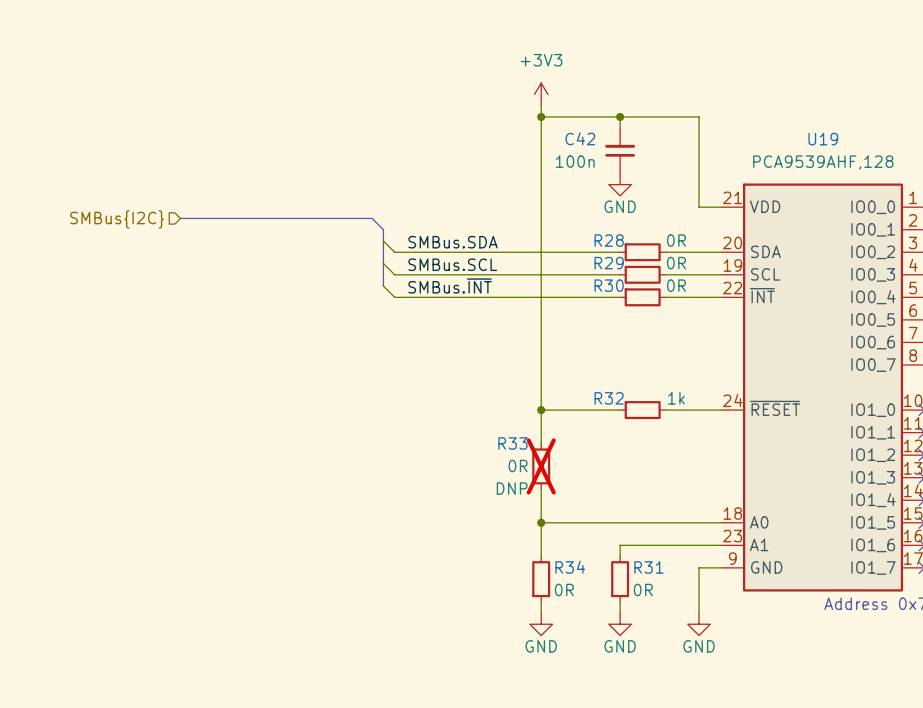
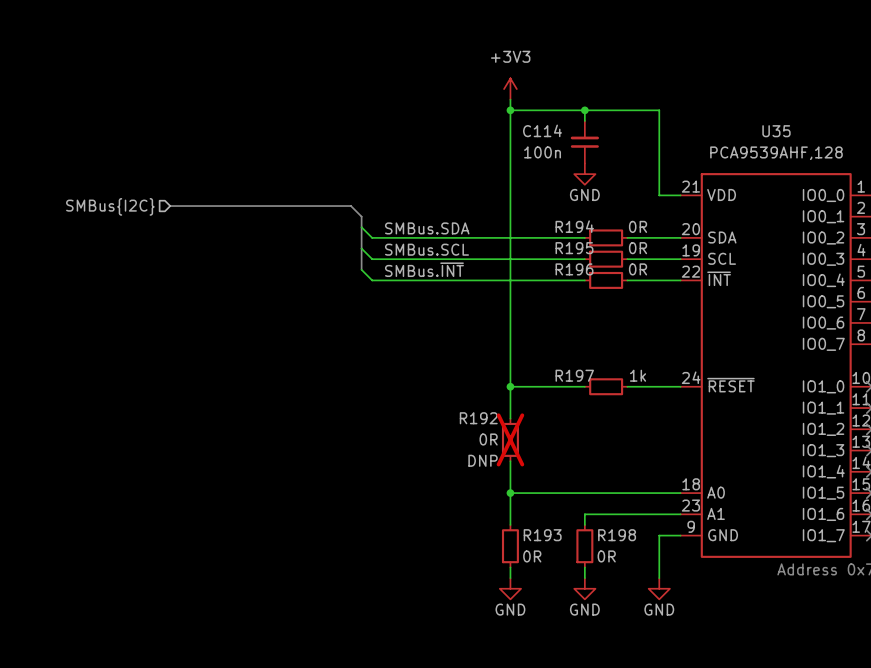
C42 name: C42 (580, 138) -> C114 (542, 130)
U19 name: U19 (823, 139) -> U35 (776, 131)
R28 name: R28 (609, 240) -> R194 (574, 226)
R29 name: R29 (609, 263) -> R195 (574, 248)
R30 name: R30 (609, 285) -> R196 (574, 269)
R32 name: R32 (609, 398) -> R197 (574, 375)
R33 name: R33 (512, 443) -> R192 (478, 418)
R34 name: R34 (570, 567) -> R193 (542, 535)
R31 name: R31 (648, 567) -> R198 (617, 535)

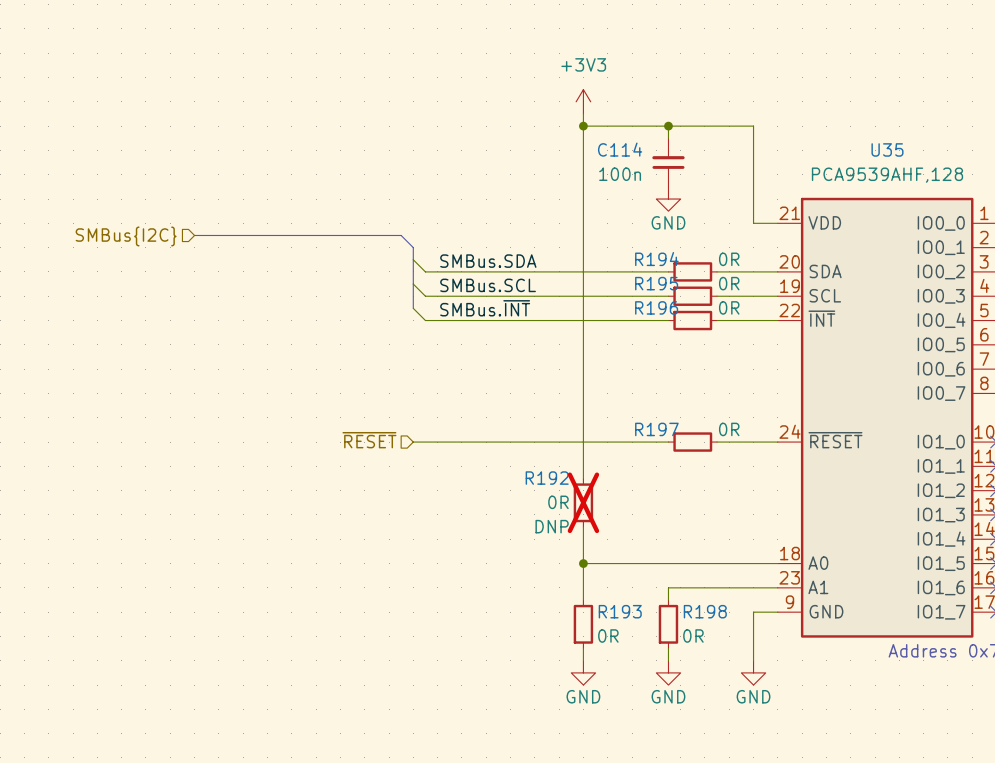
R197 text: 1k (638, 375) -> 0R (729, 429)
hierarchical label: none -> ~{RESET} (369, 440)
wire: none -> (413, 442) (583, 442)
junction: (510, 386) -> none

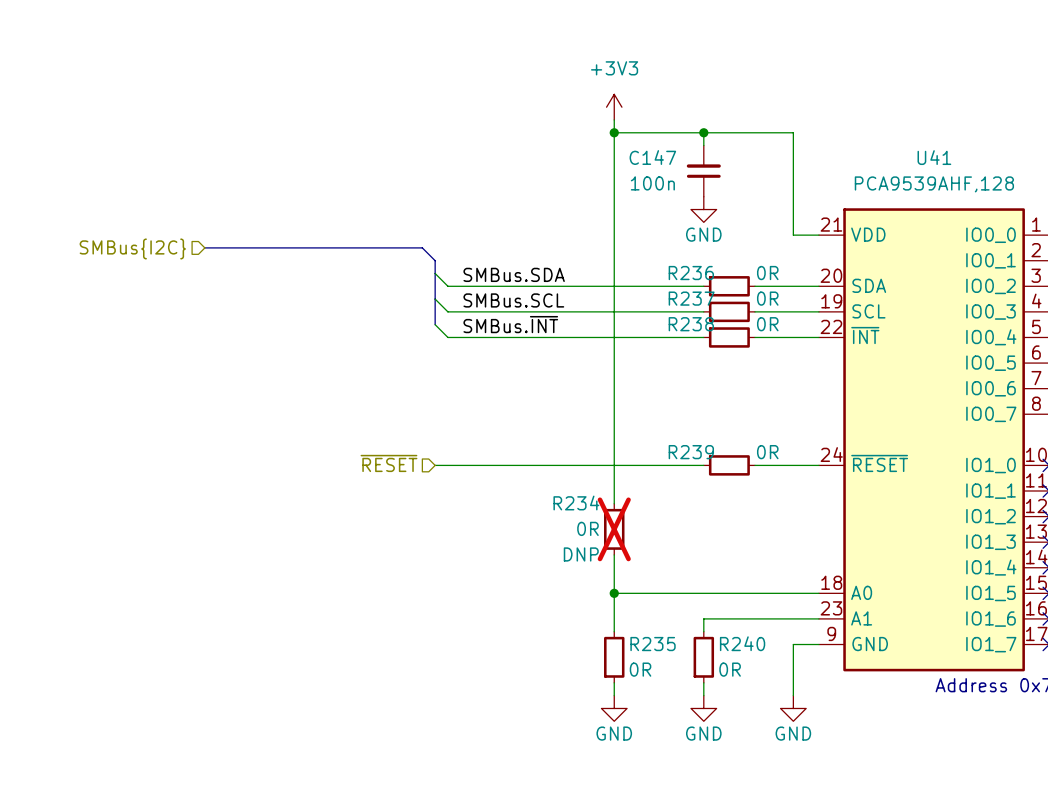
C114 name: C114 (620, 149) -> C147 (652, 157)
U35 name: U35 (887, 149) -> U41 (934, 157)
R194 name: R194 (656, 259) -> R236 (691, 273)
R195 name: R195 (656, 283) -> R237 (691, 298)
R196 name: R196 (656, 307) -> R238 (691, 324)
R197 name: R197 (656, 429) -> R239 (691, 452)
R192 name: R192 (547, 478) -> R234 (576, 503)
R193 name: R193 (620, 611) -> R235 (653, 644)
R198 name: R198 (705, 611) -> R240 (742, 643)

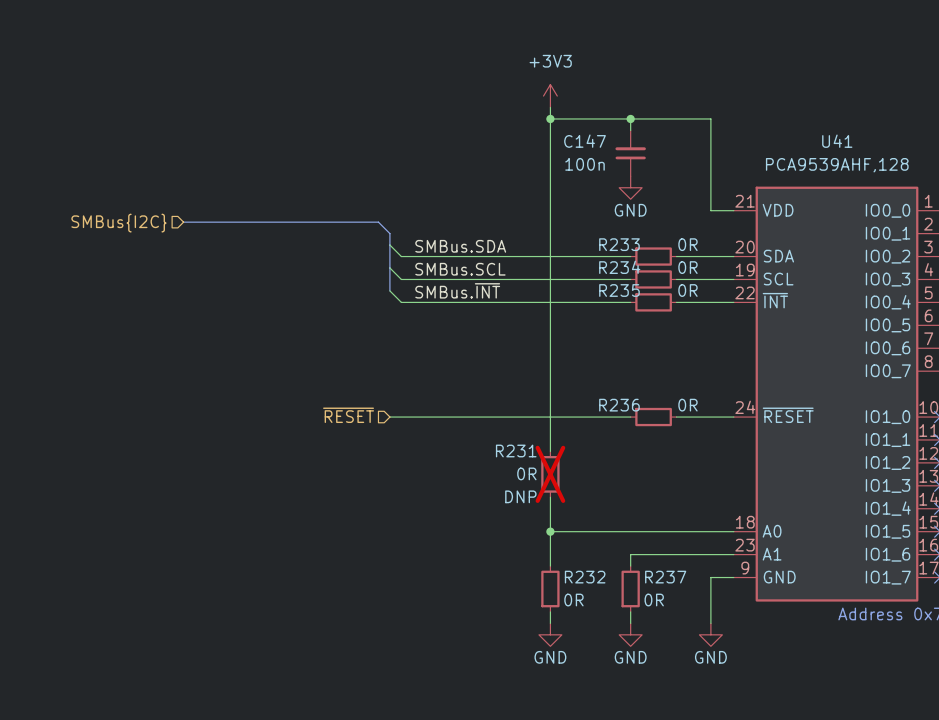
R236 name: R236 (691, 273) -> R233 (619, 244)
R237 name: R237 (691, 298) -> R234 (619, 267)
R238 name: R238 (691, 324) -> R235 (619, 290)
R239 name: R239 (691, 452) -> R236 (619, 405)
R234 name: R234 (576, 503) -> R231 (516, 451)
R240 name: R240 (742, 643) -> R237 (665, 577)
R235 name: R235 (653, 644) -> R232 (585, 577)

